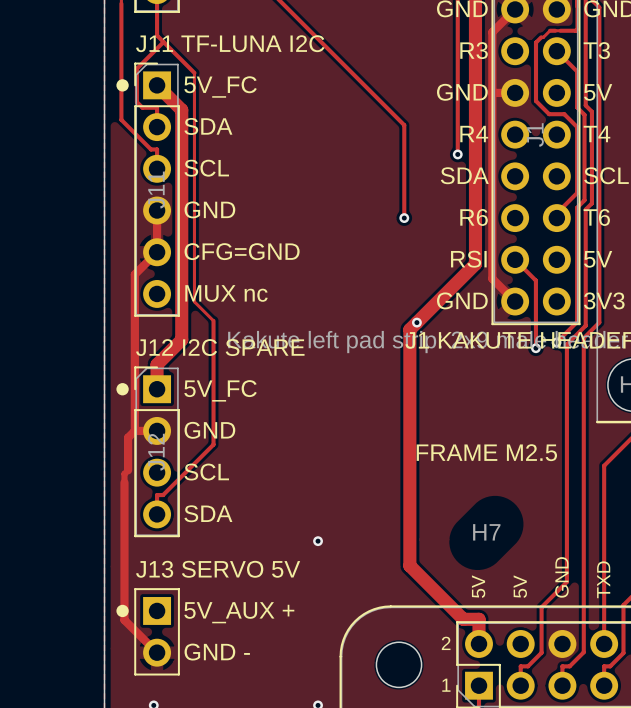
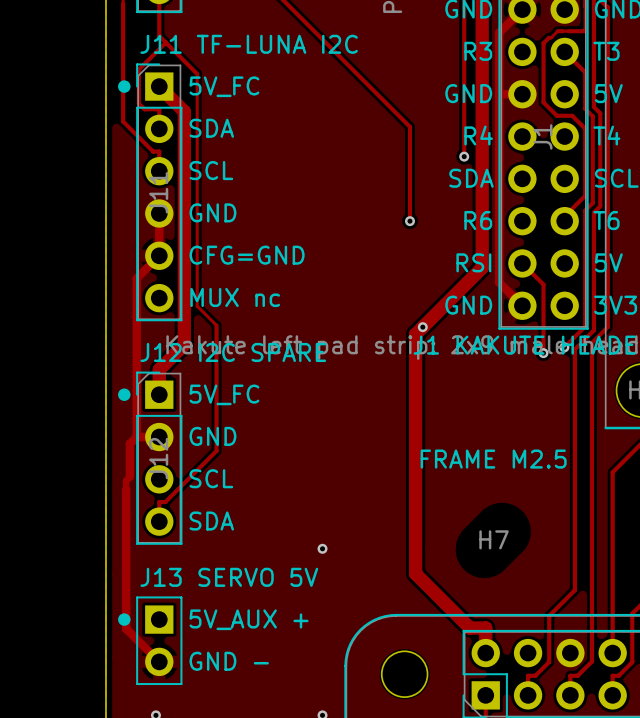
text: GND (561, 577) -> none
text: TXD (603, 579) -> none
text: 5V (478, 586) -> none
text: 5V (520, 586) -> none
text: 2 (446, 643) -> none
text: 1 (446, 685) -> none

